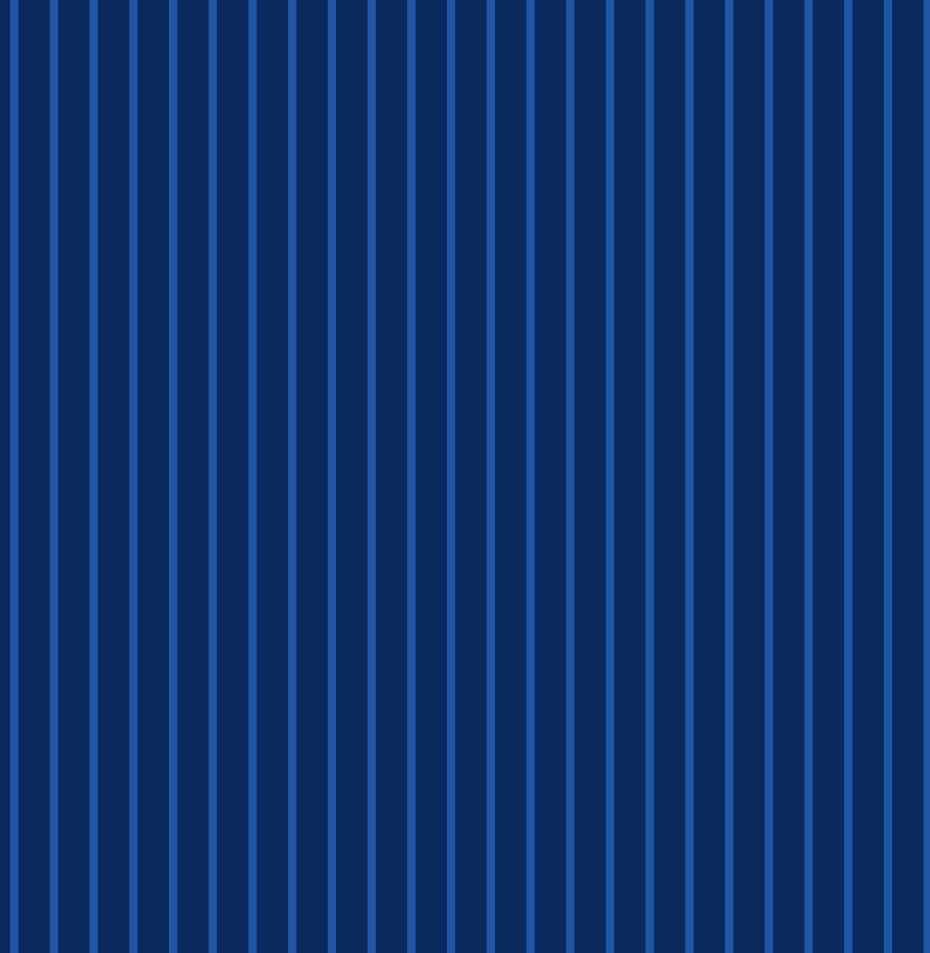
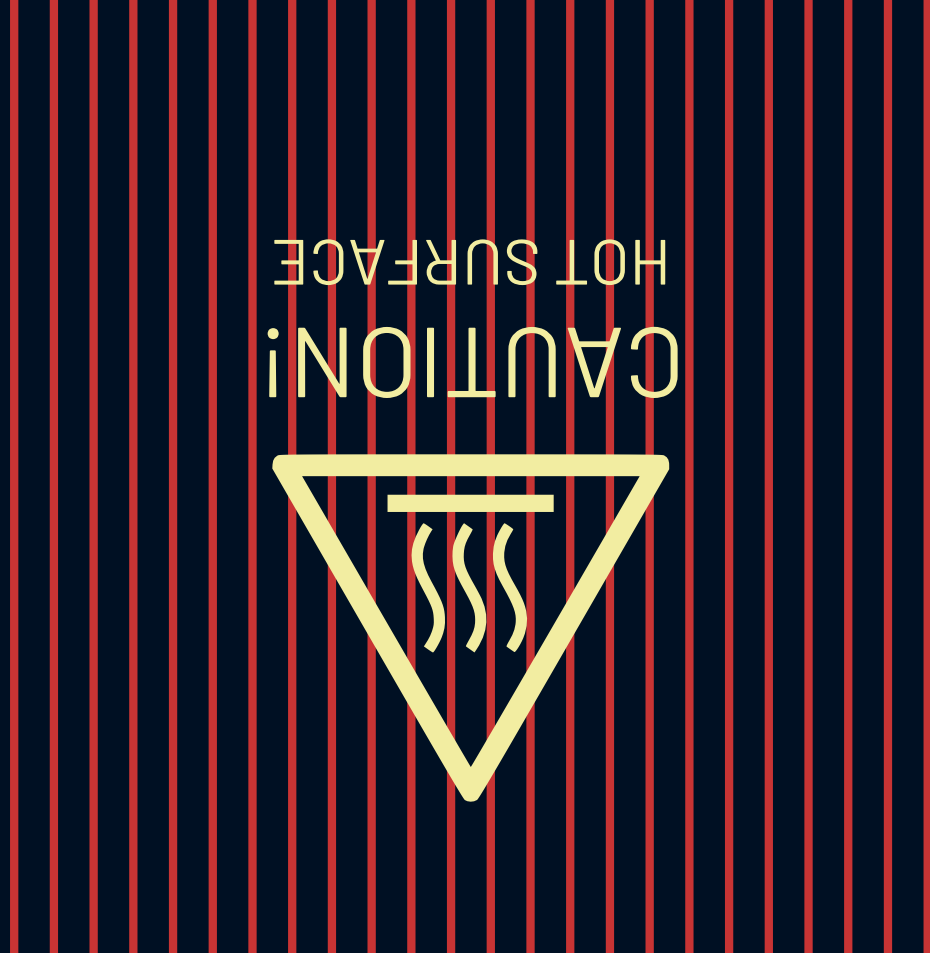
text: none -> HOT SURFACE (469, 262)
text: none -> CAUTION! (472, 362)
drawing: none -> [272, 454, 670, 802]

